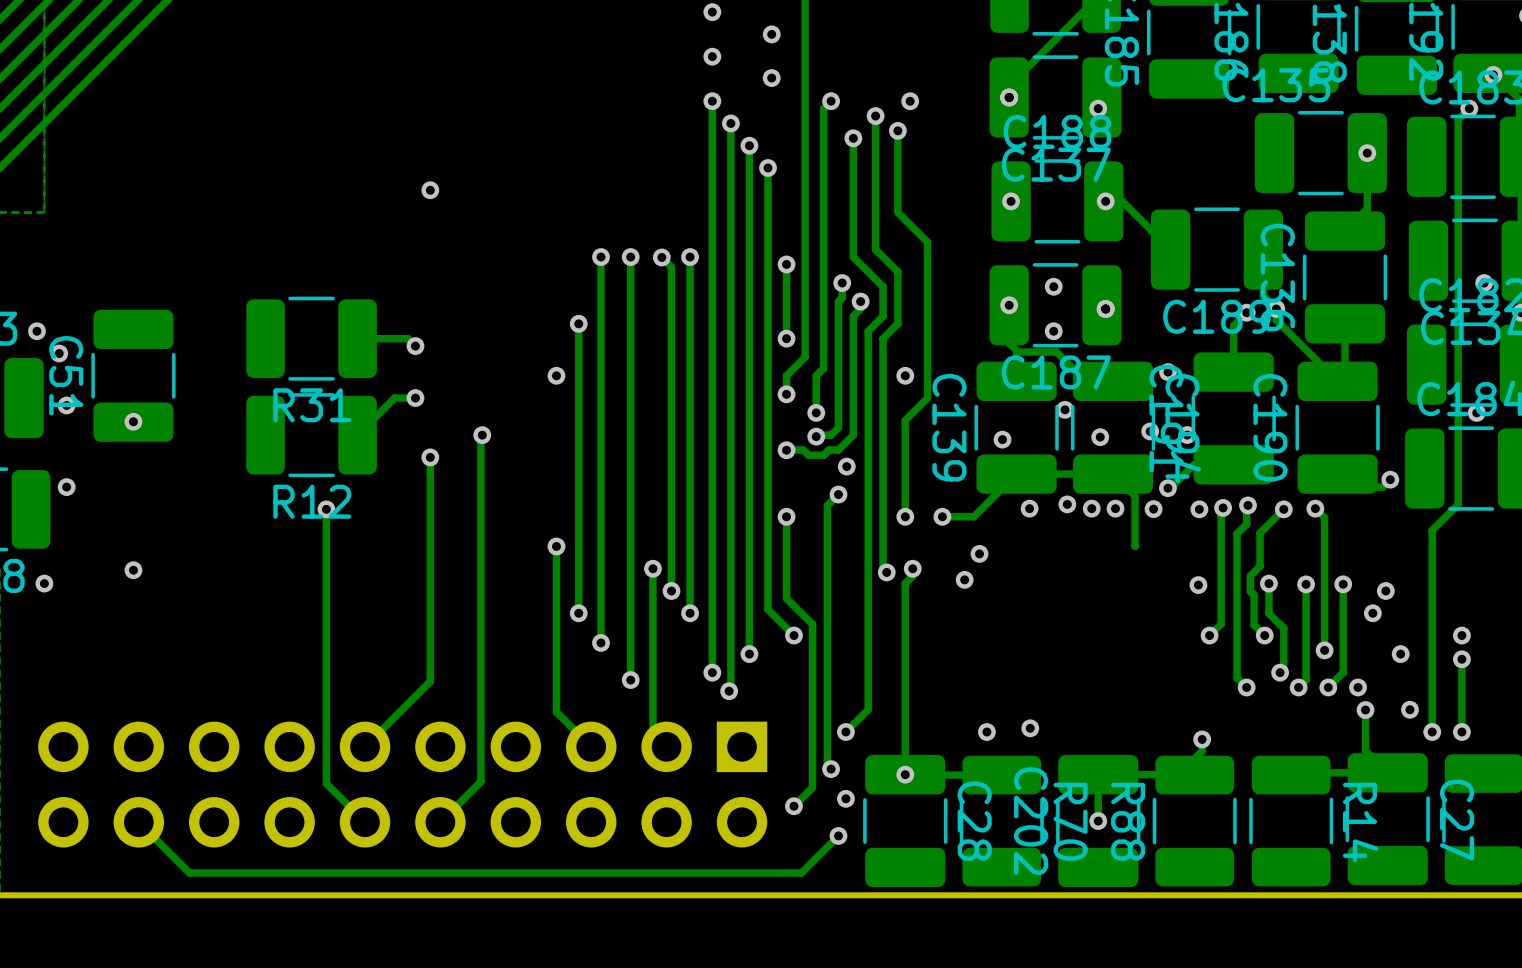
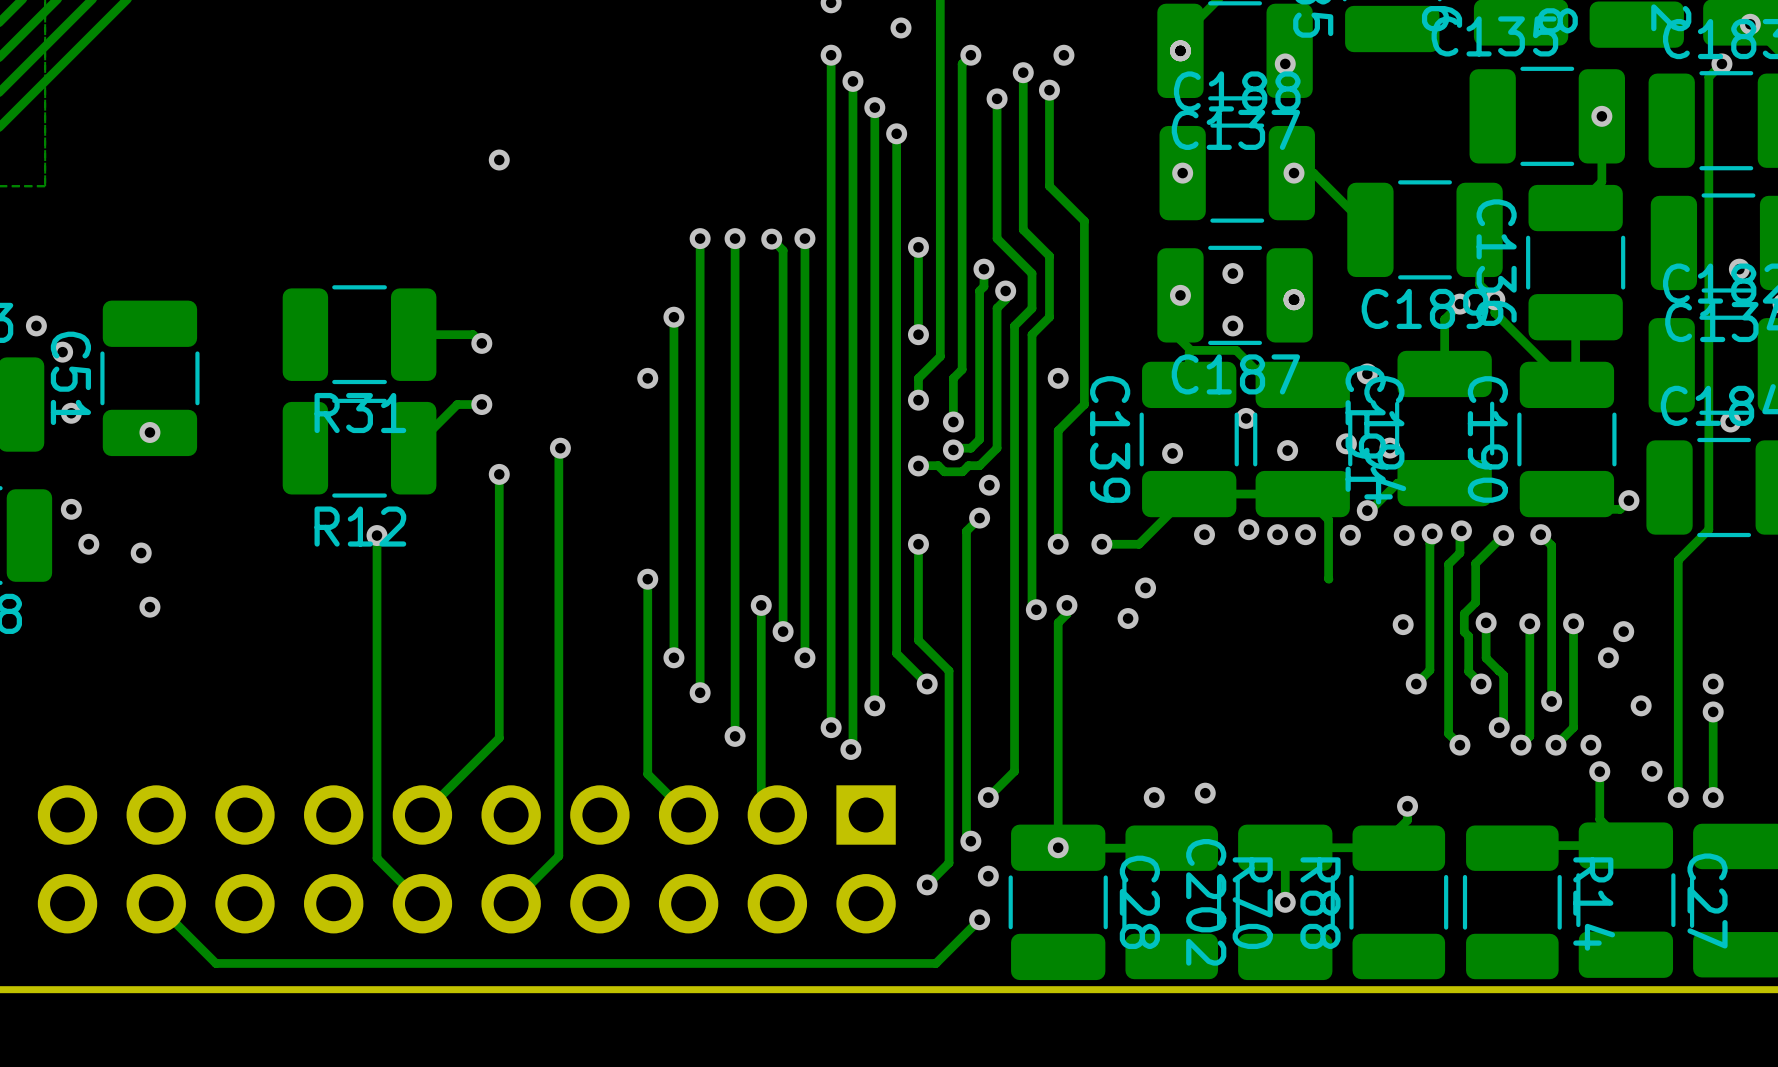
via: none -> (88, 544)
via: none -> (141, 553)
via: (44, 583) -> none

